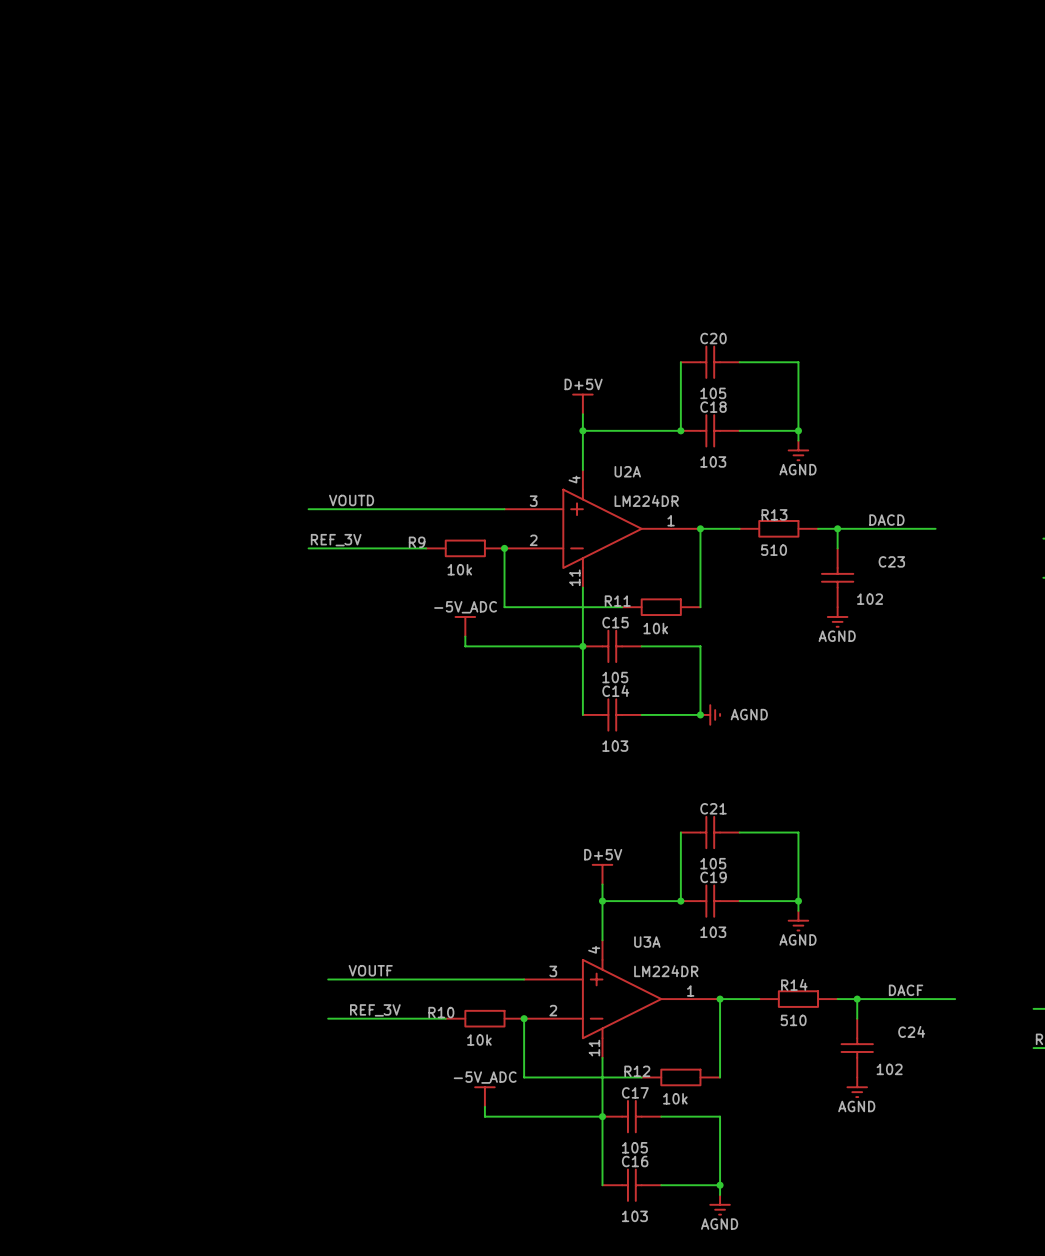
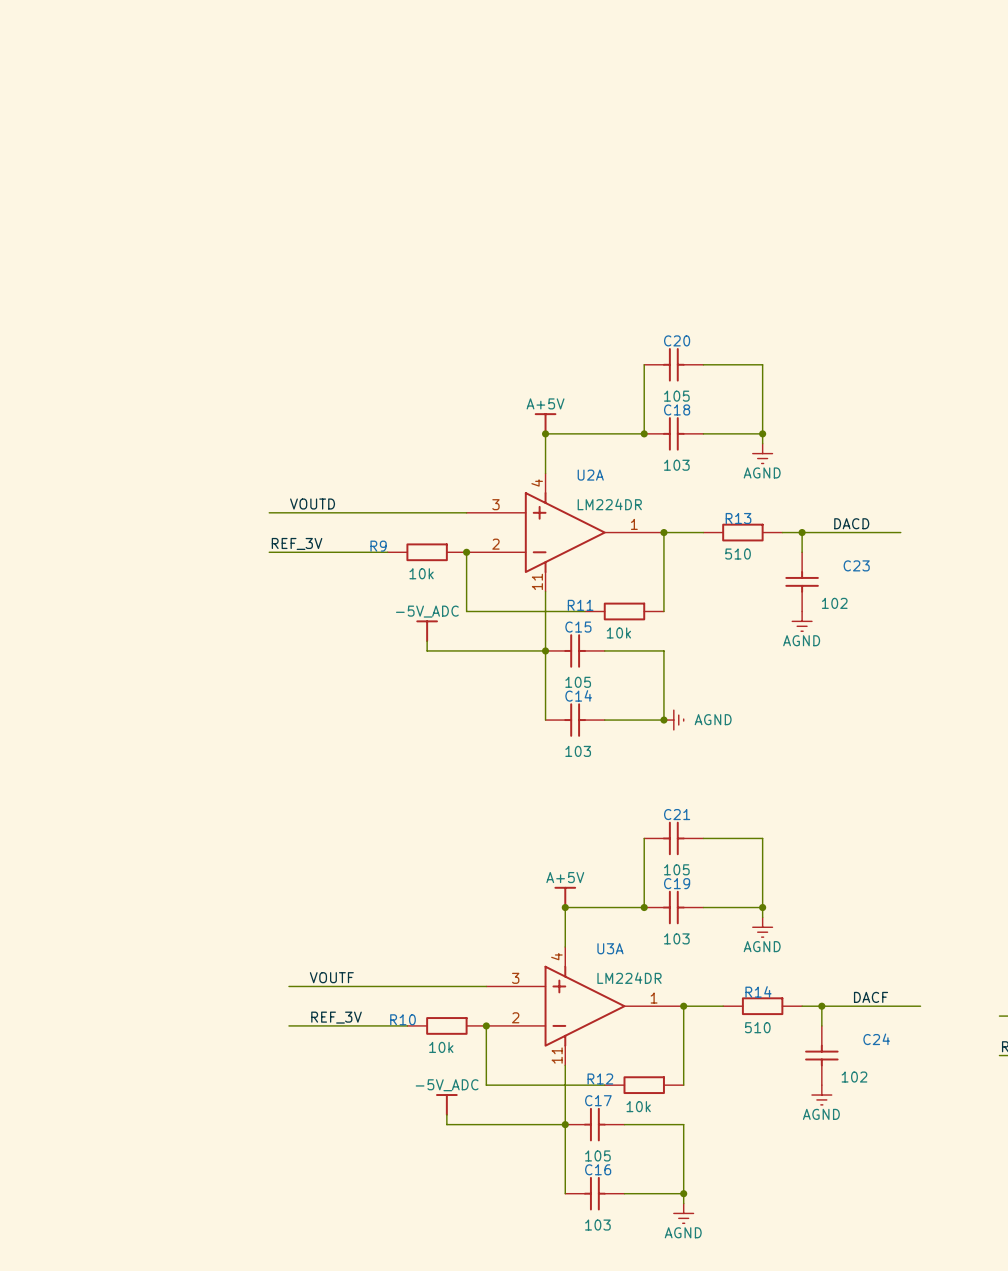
power symbol: D+5V (582, 404) -> none
power symbol: none -> A+5V (545, 424)
power symbol: D+5V (602, 874) -> none
power symbol: none -> A+5V (565, 897)

